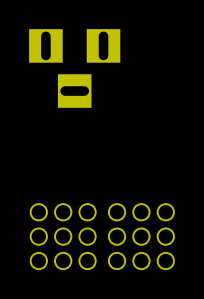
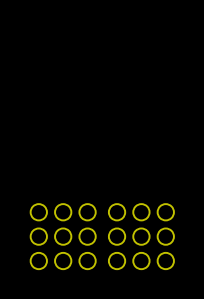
part: (74, 68) -> none

